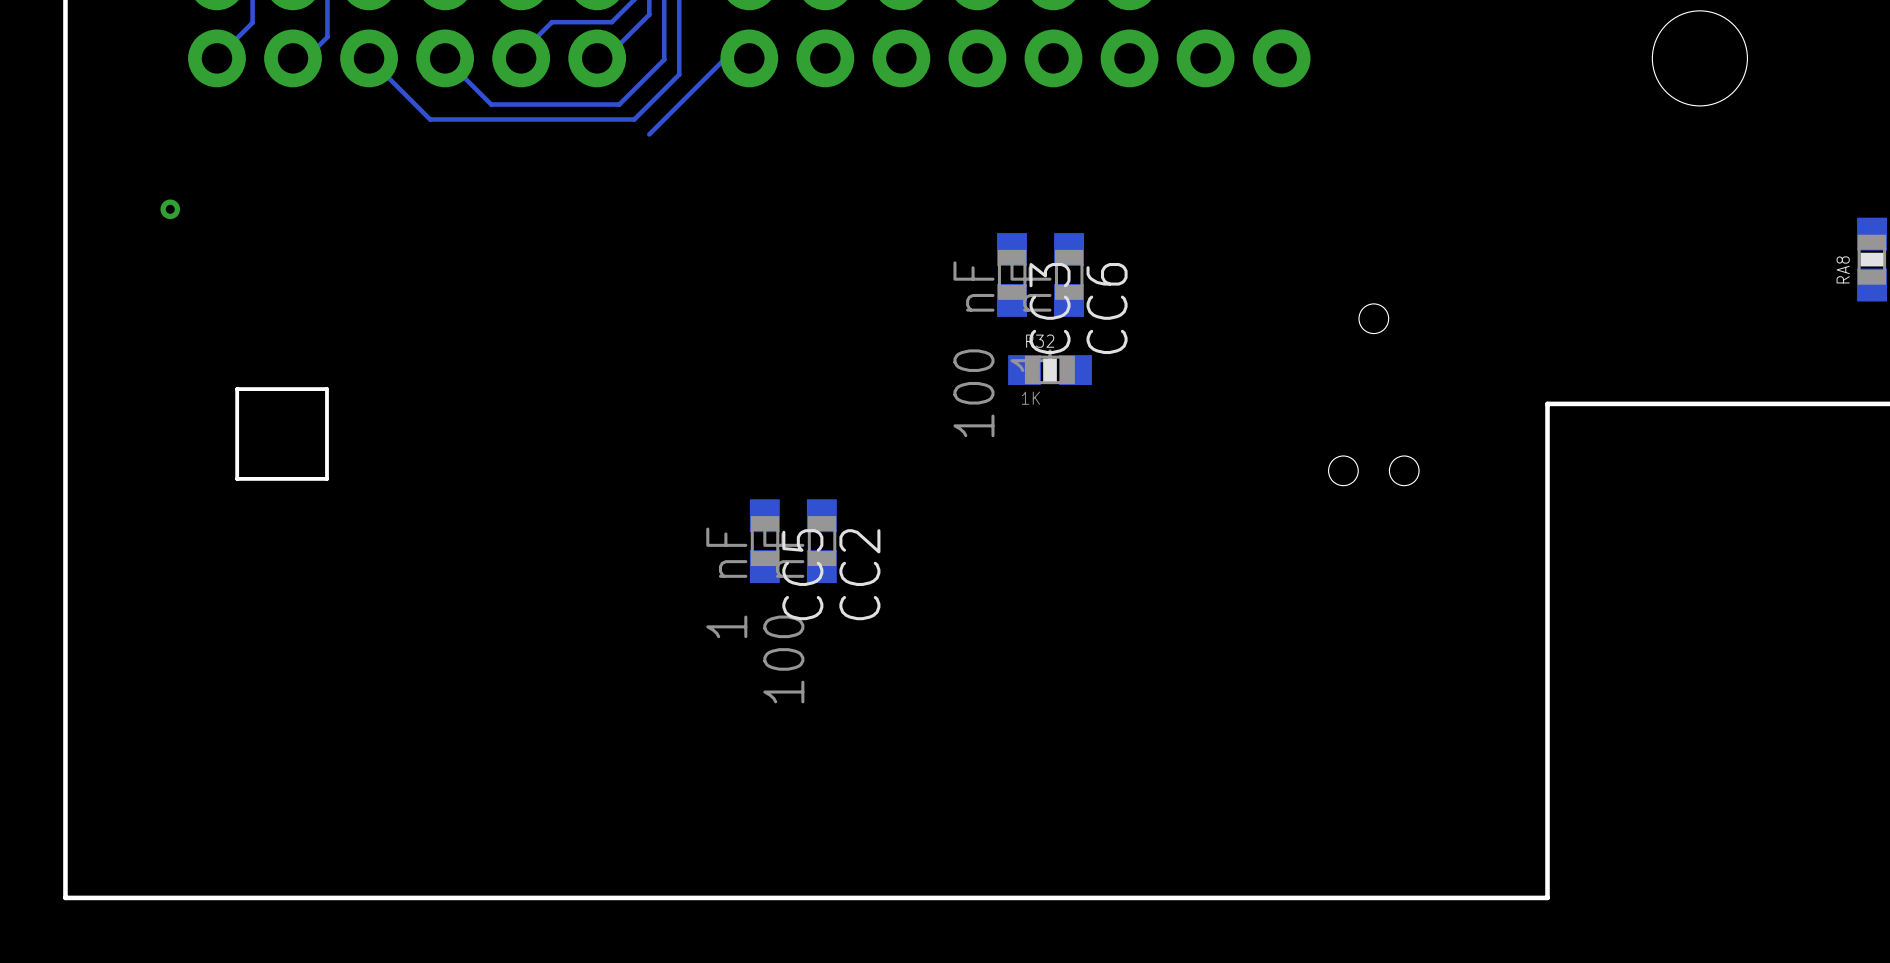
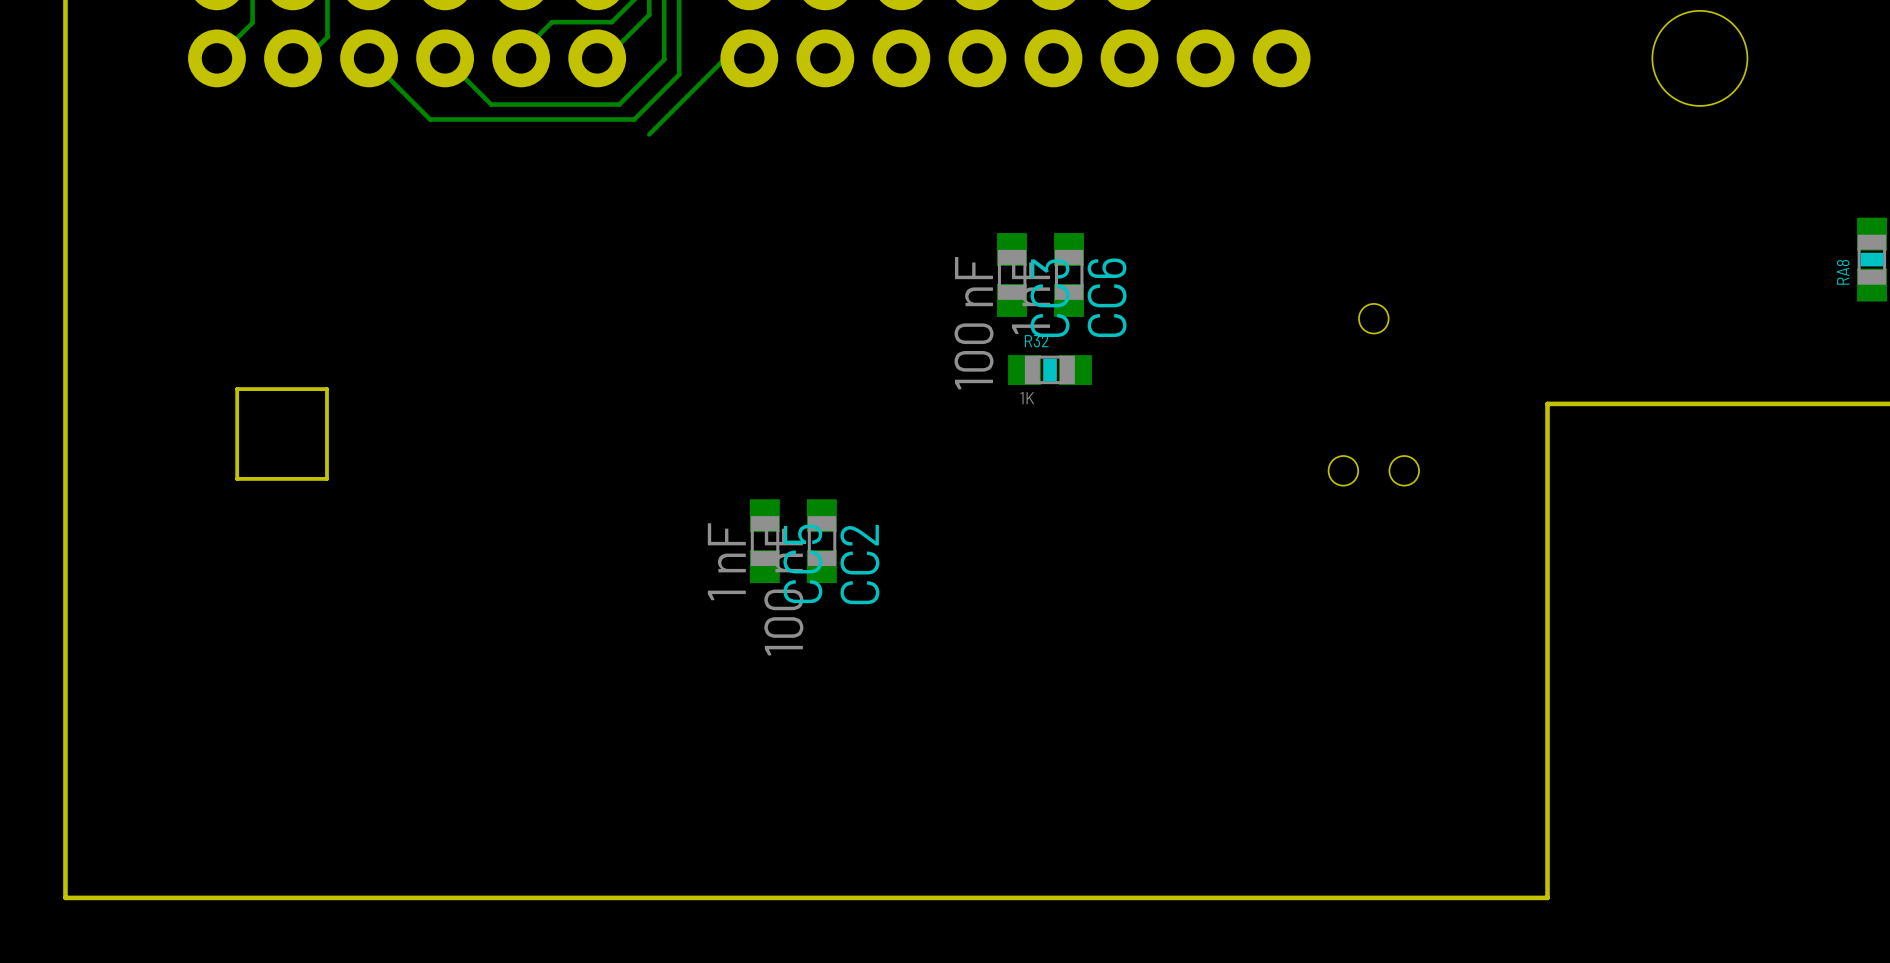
via: (170, 209) -> none

